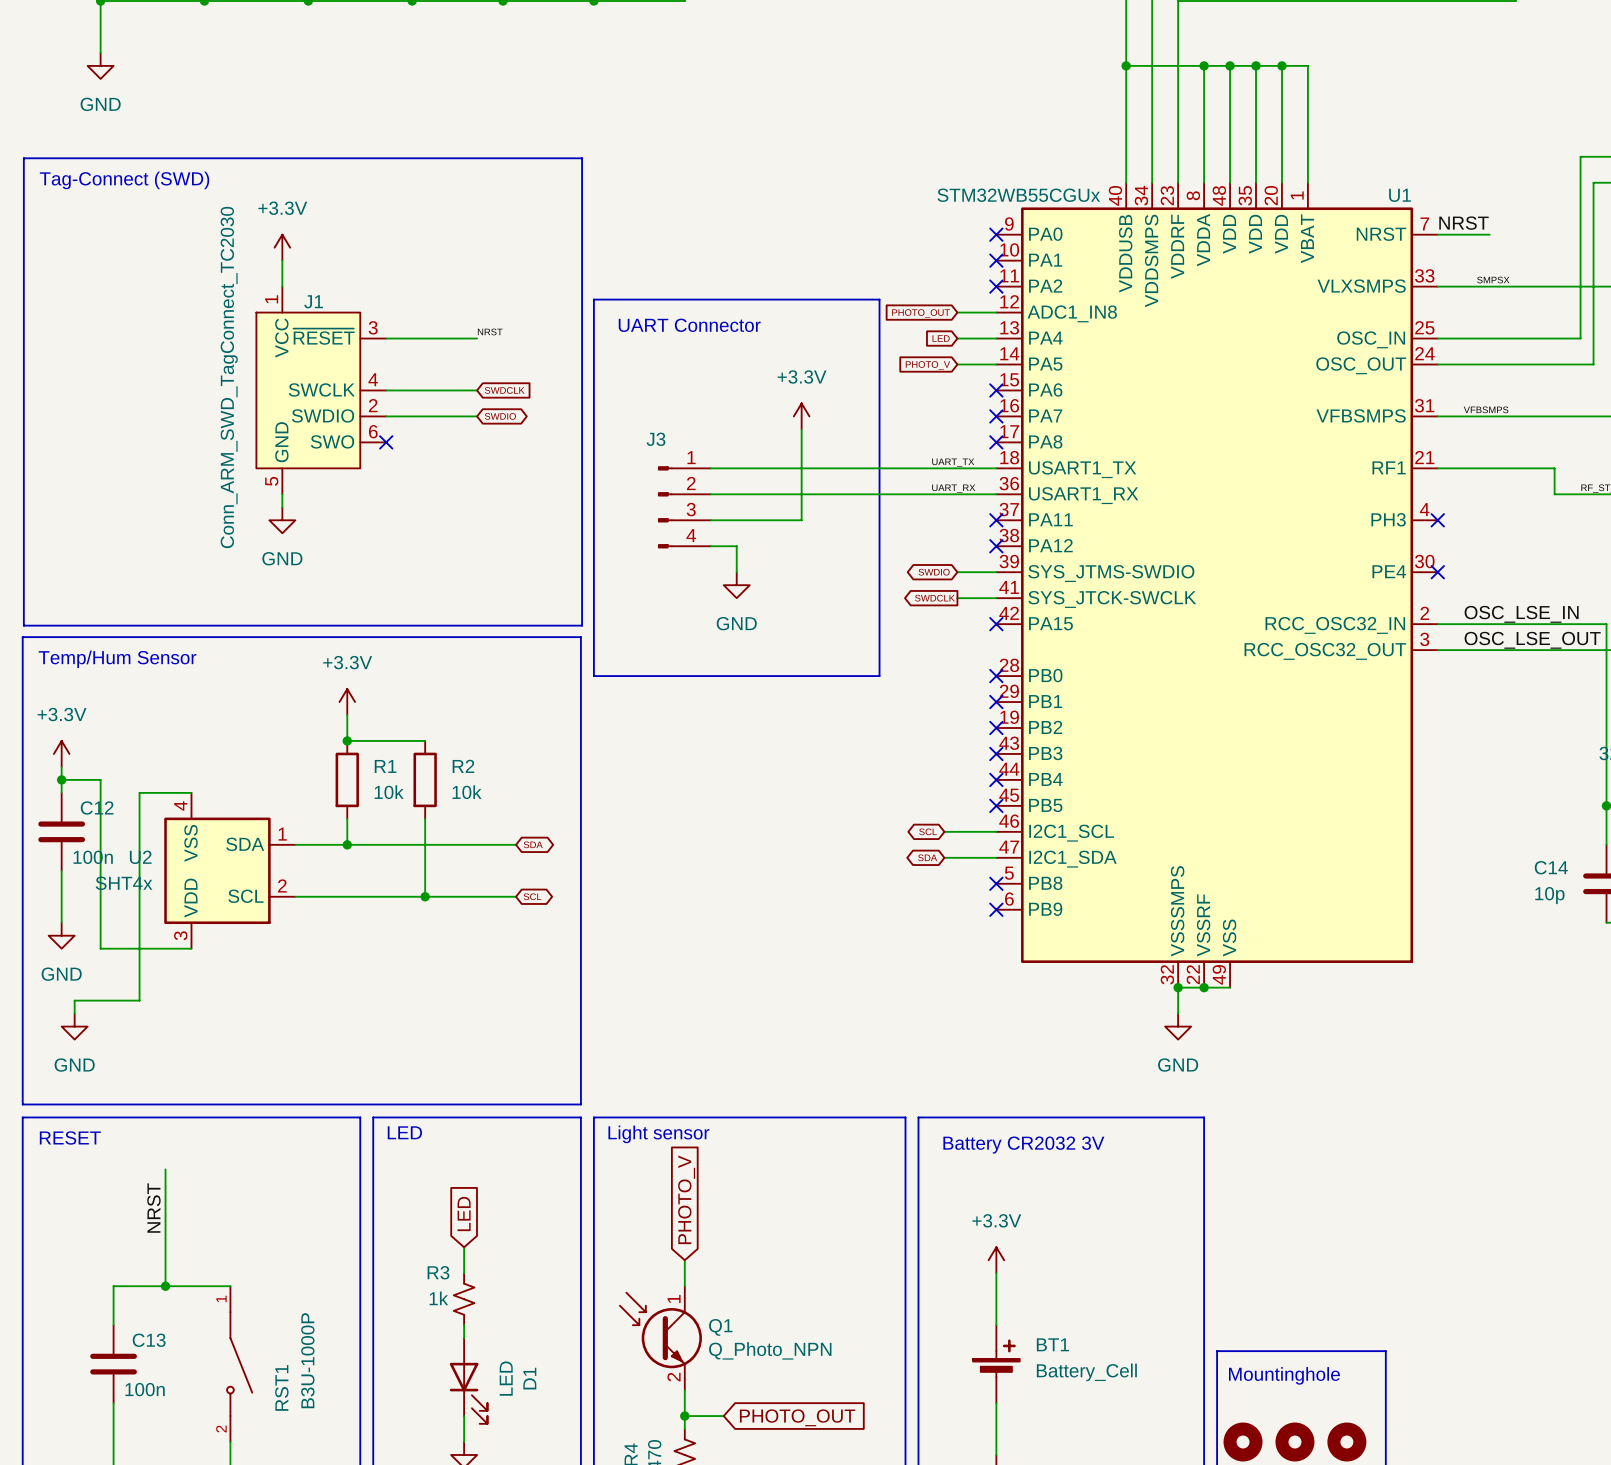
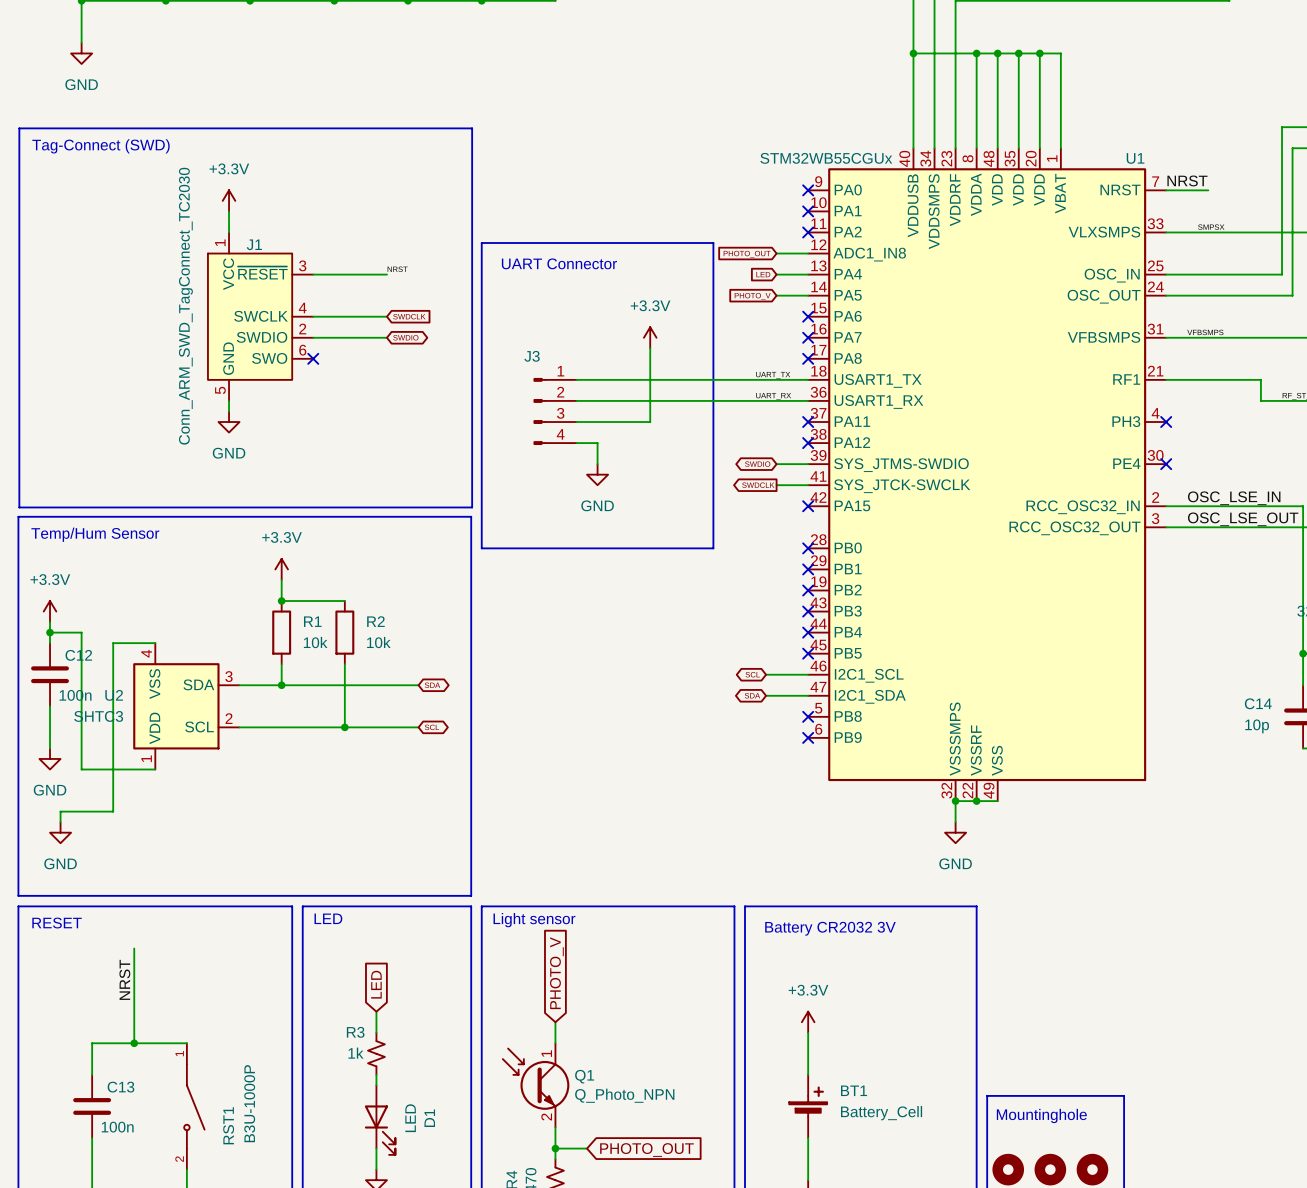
U2 pin number: 1 (282, 834) -> 3 (228, 676)
U2 value: SHT4x (124, 883) -> SHTC3 (98, 716)
U2 pin number: 3 (180, 935) -> 1 (146, 758)

